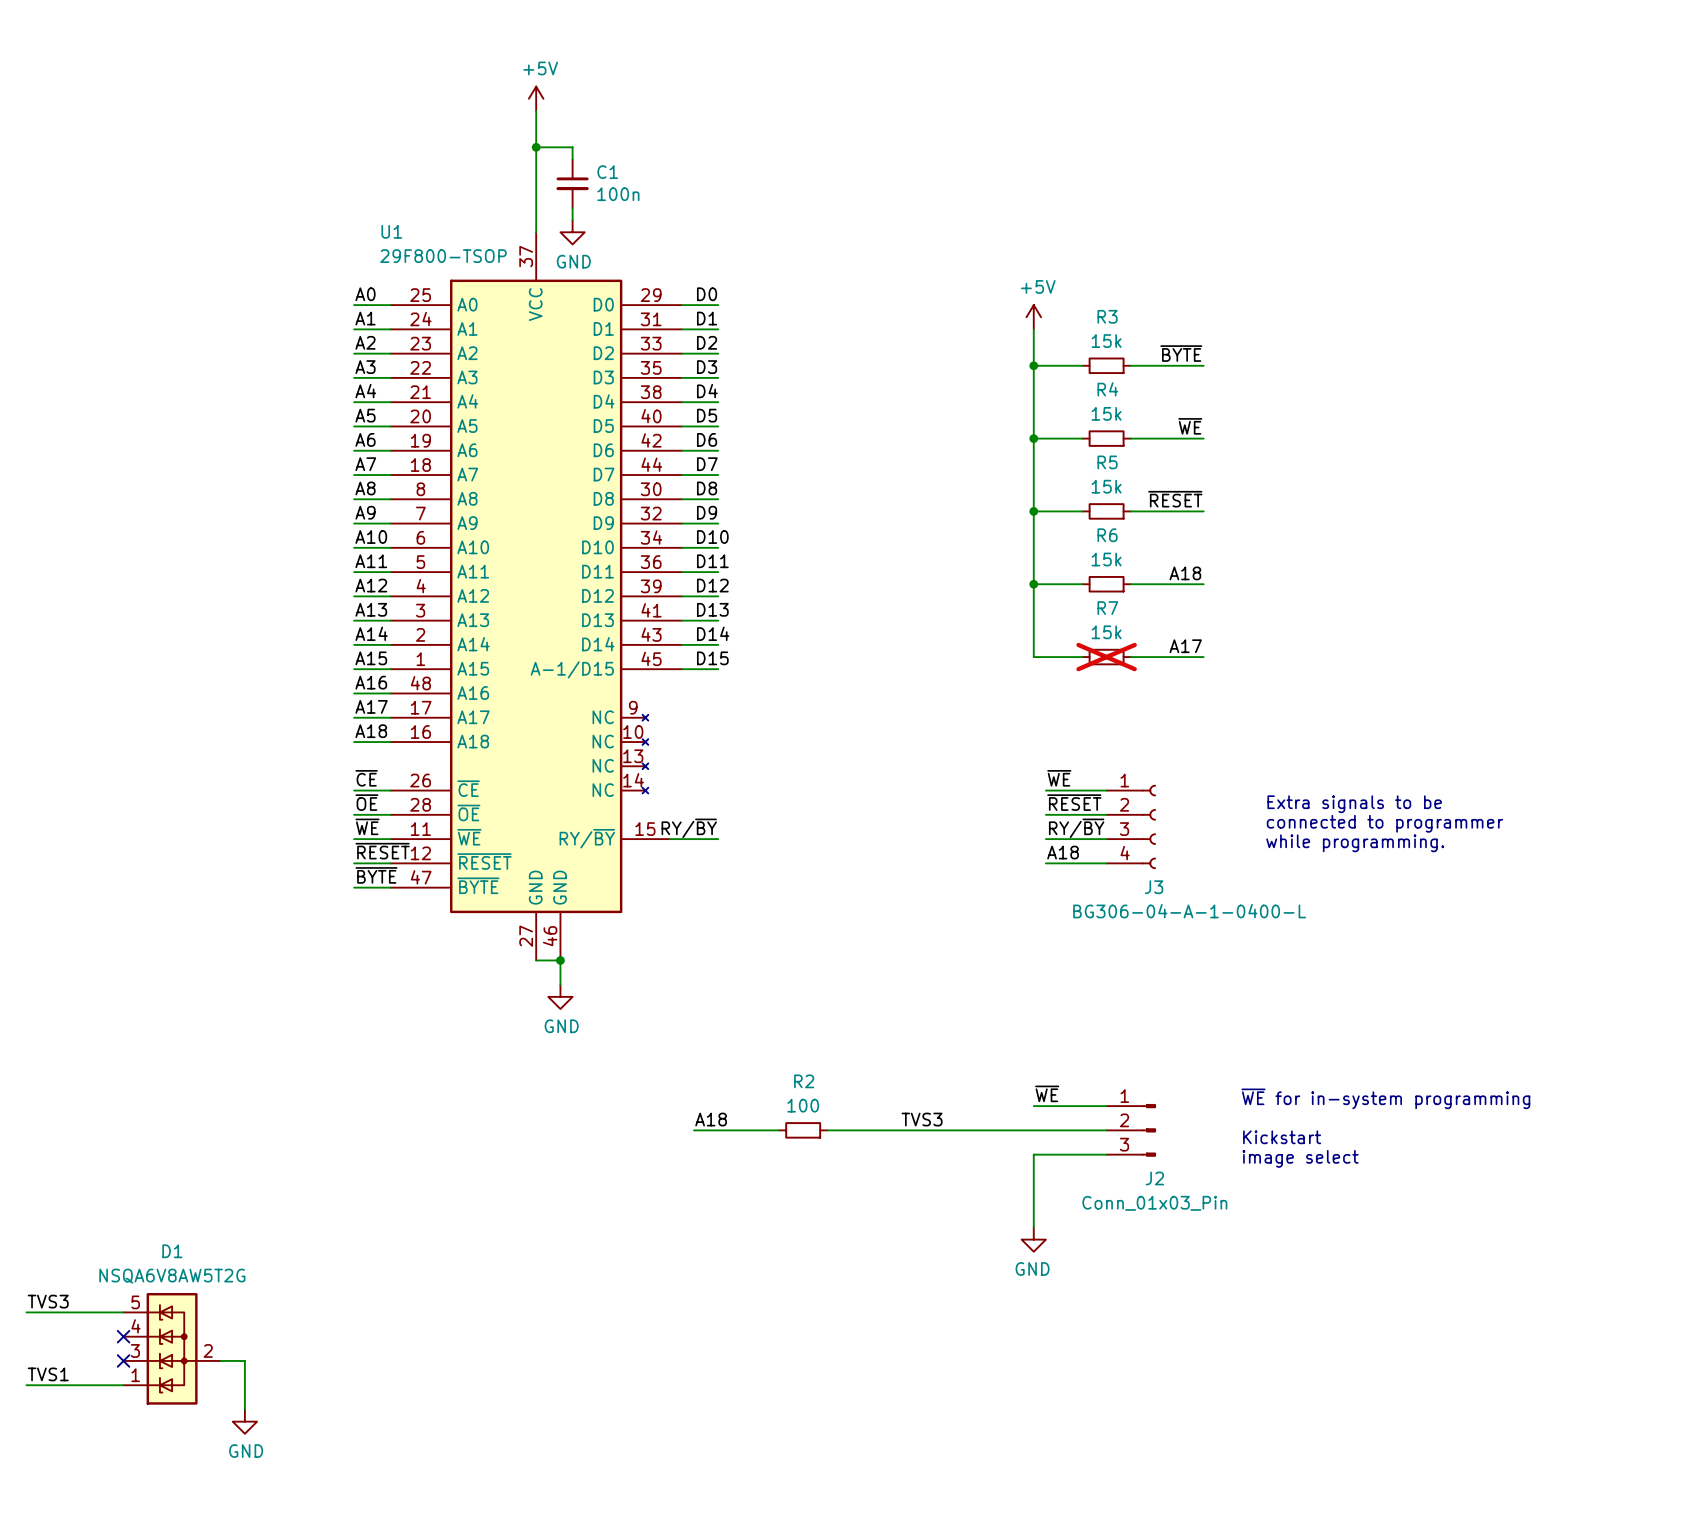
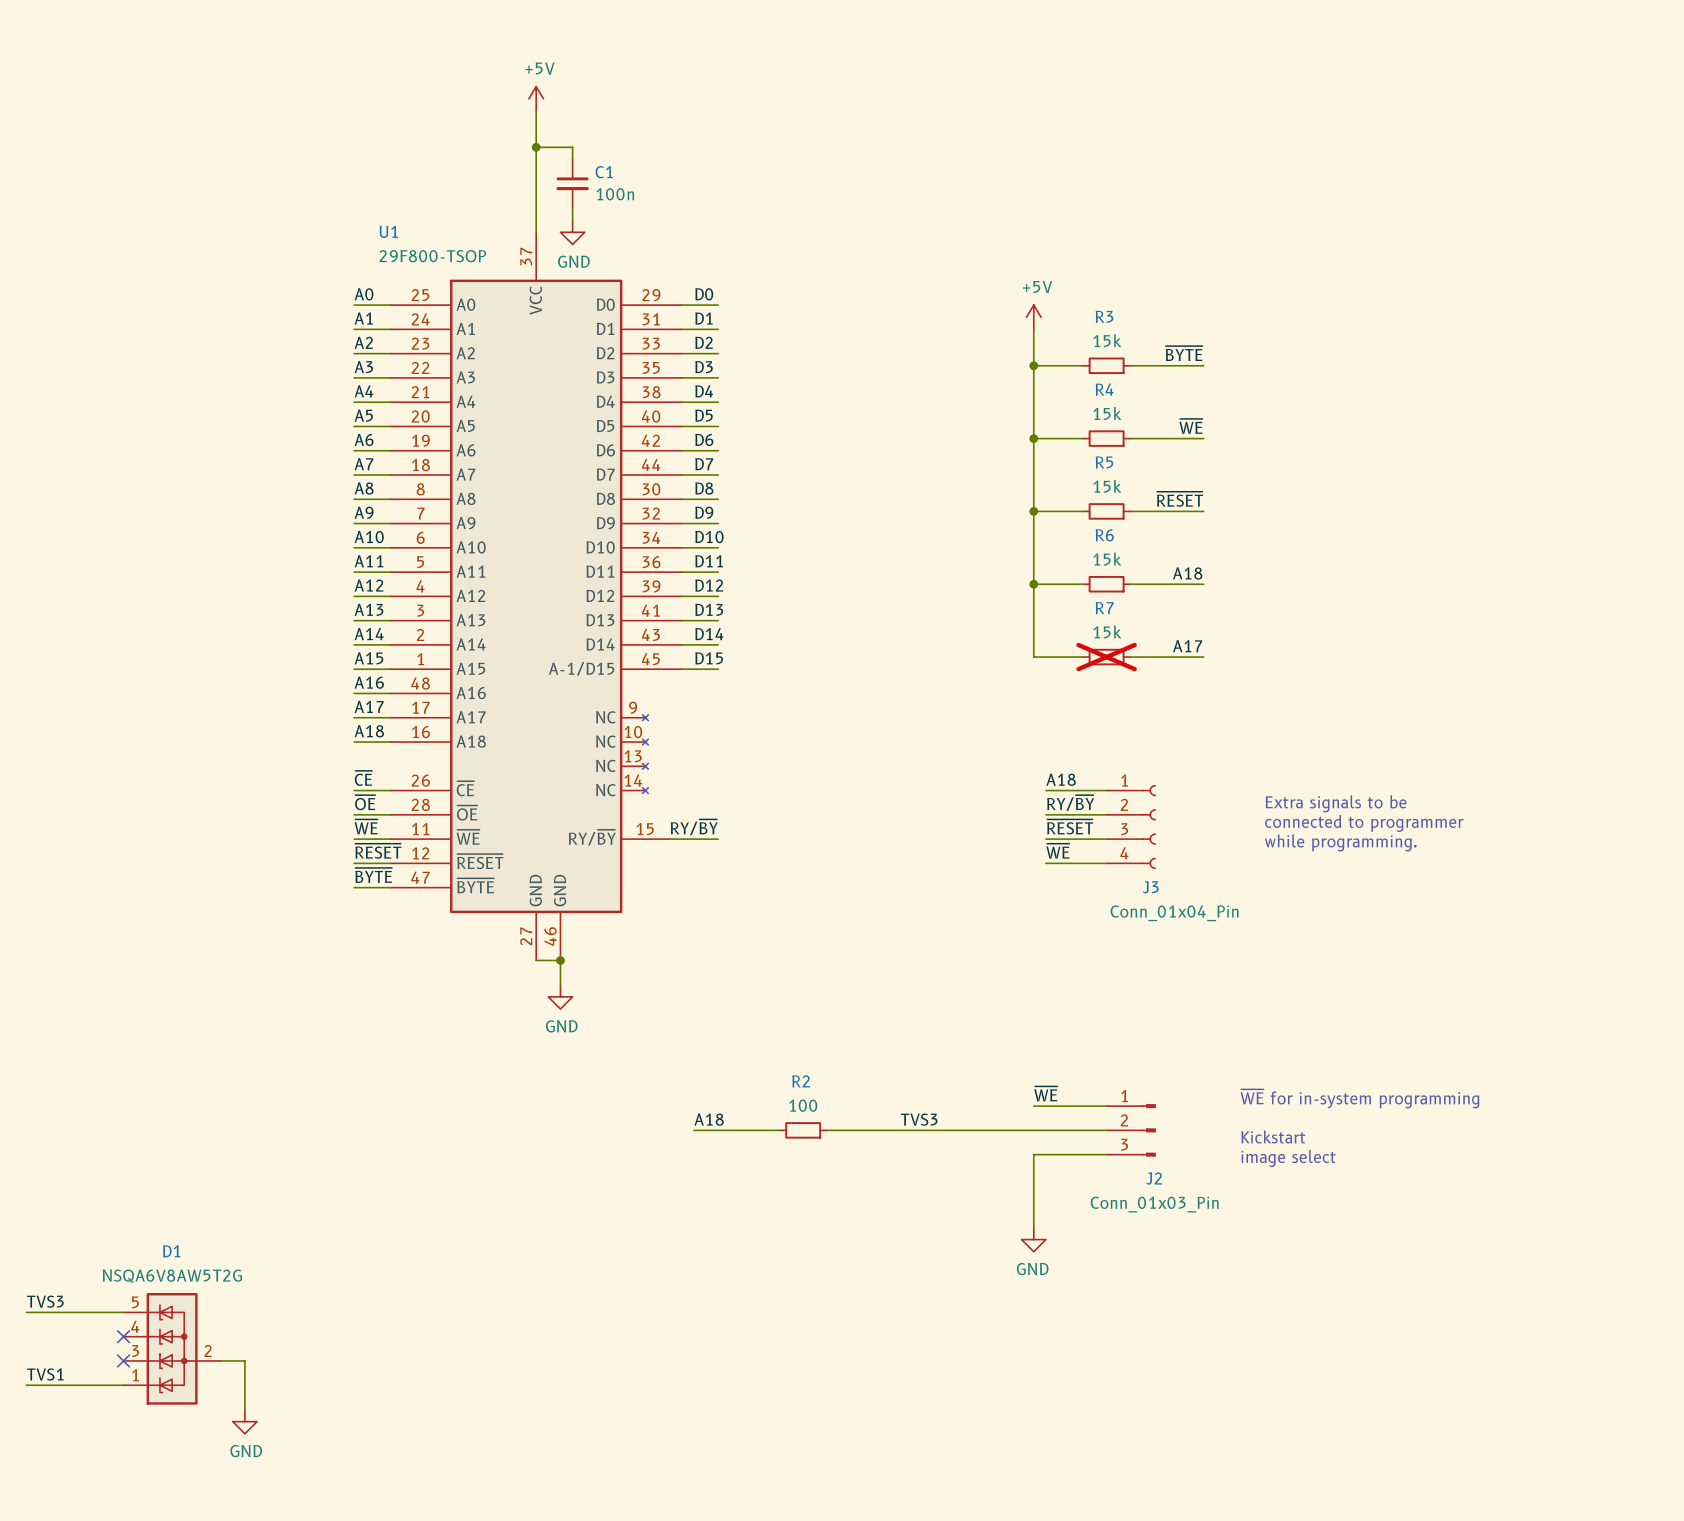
label: ~{WE} (1059, 778) -> A18 (1061, 779)
label: ~{RESET} (1074, 802) -> RY/~{BY} (1070, 803)
label: RY/~{BY} (1076, 828) -> ~{RESET} (1070, 826)
label: A18 (1063, 852) -> ~{WE} (1057, 851)
J3 value: BG306-04-A-1-0400-L (1189, 911) -> Conn_01x04_Pin (1174, 913)

